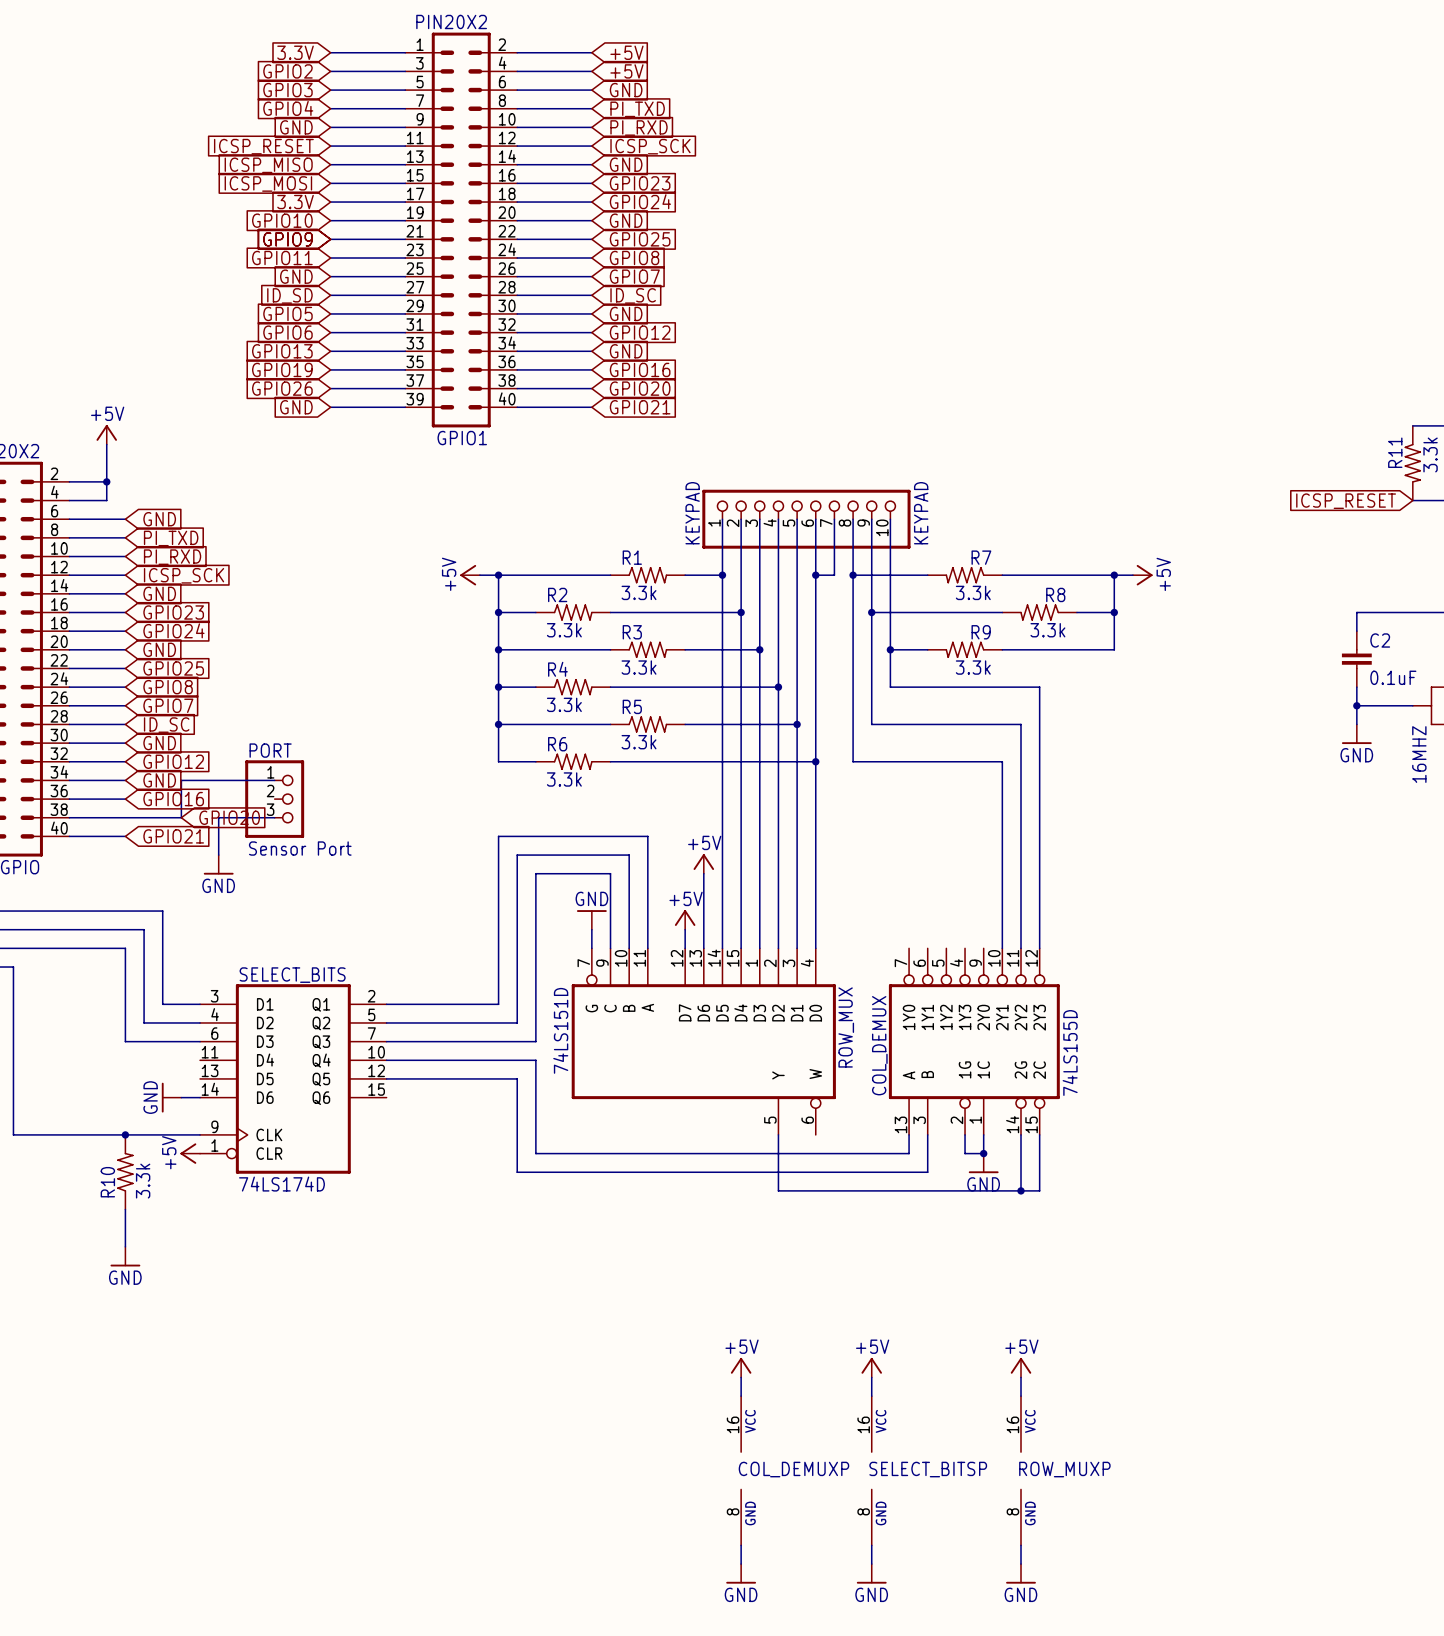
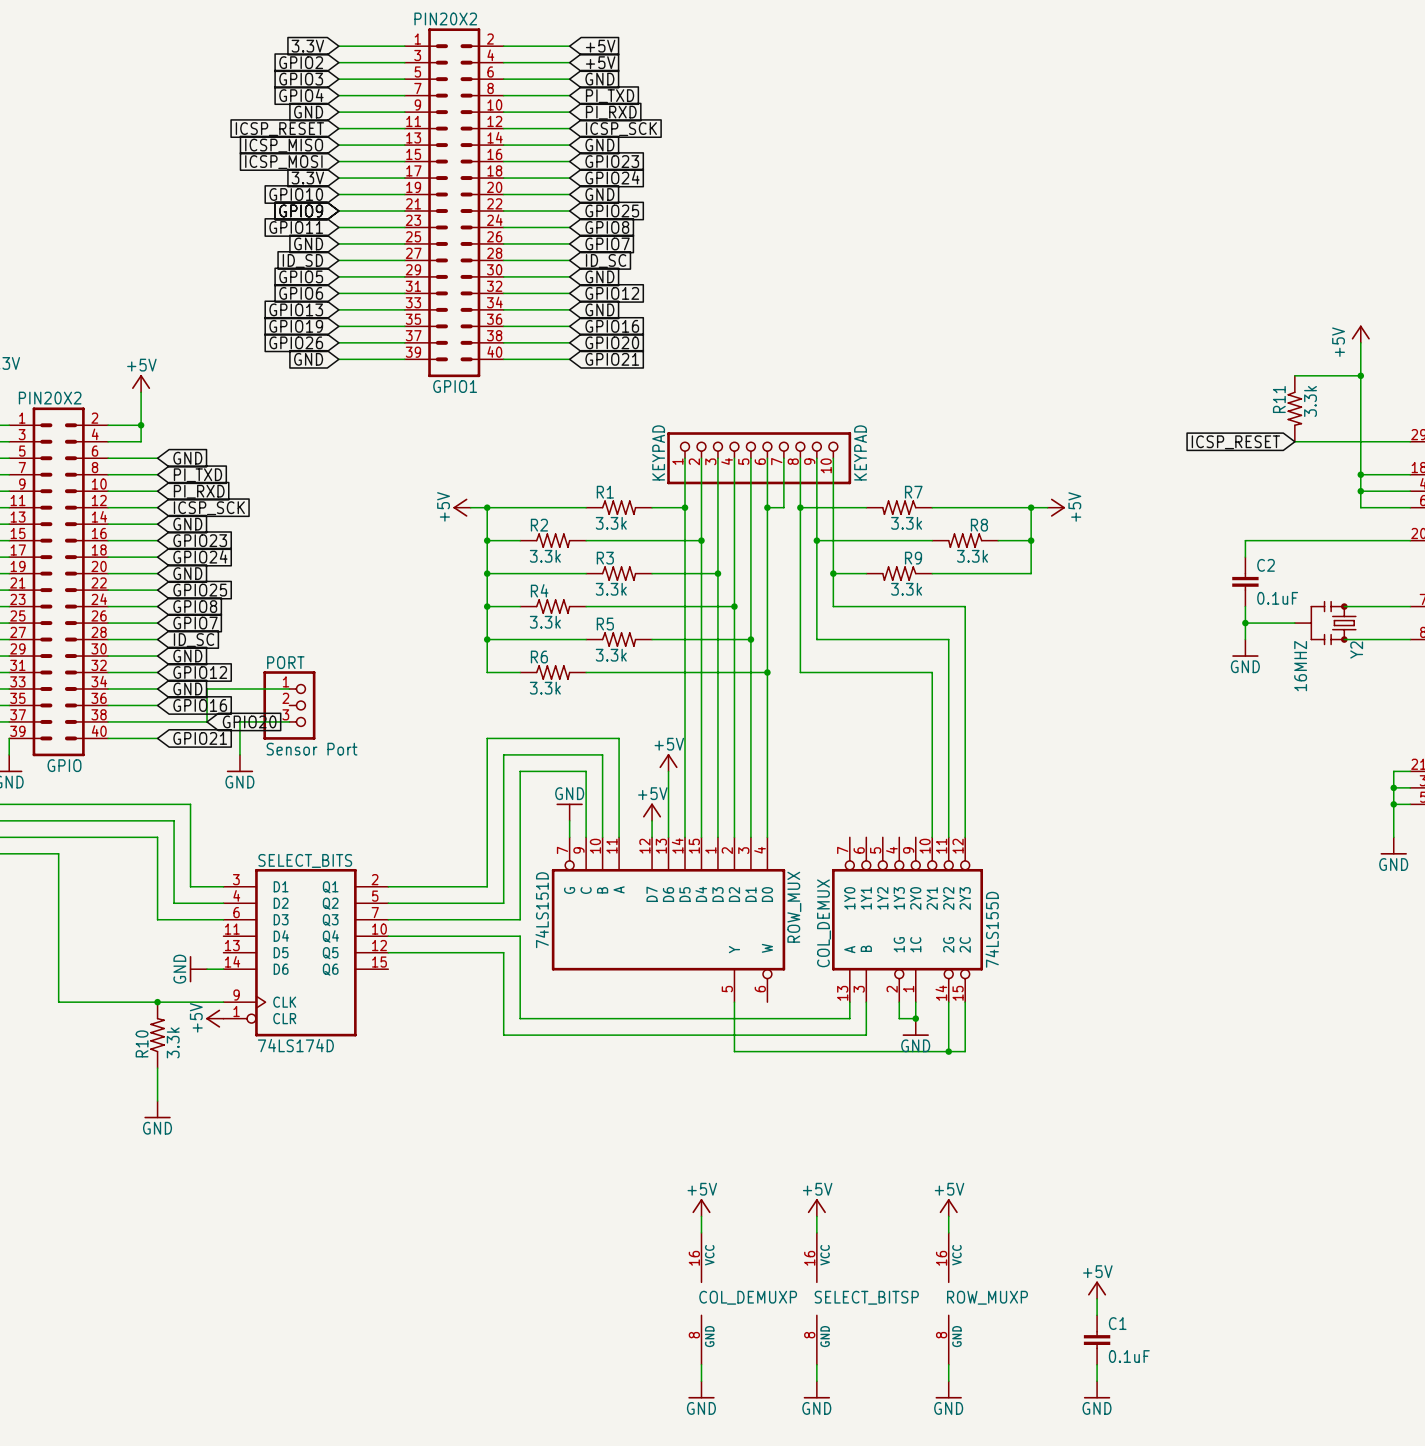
power symbol: none -> +5V (1097, 1290)
wire: none -> (1097, 1298) (1097, 1315)
C1: none -> 0.1uF (1097, 1340)
wire: none -> (1097, 1364) (1097, 1381)
power symbol: none -> GND (1097, 1389)

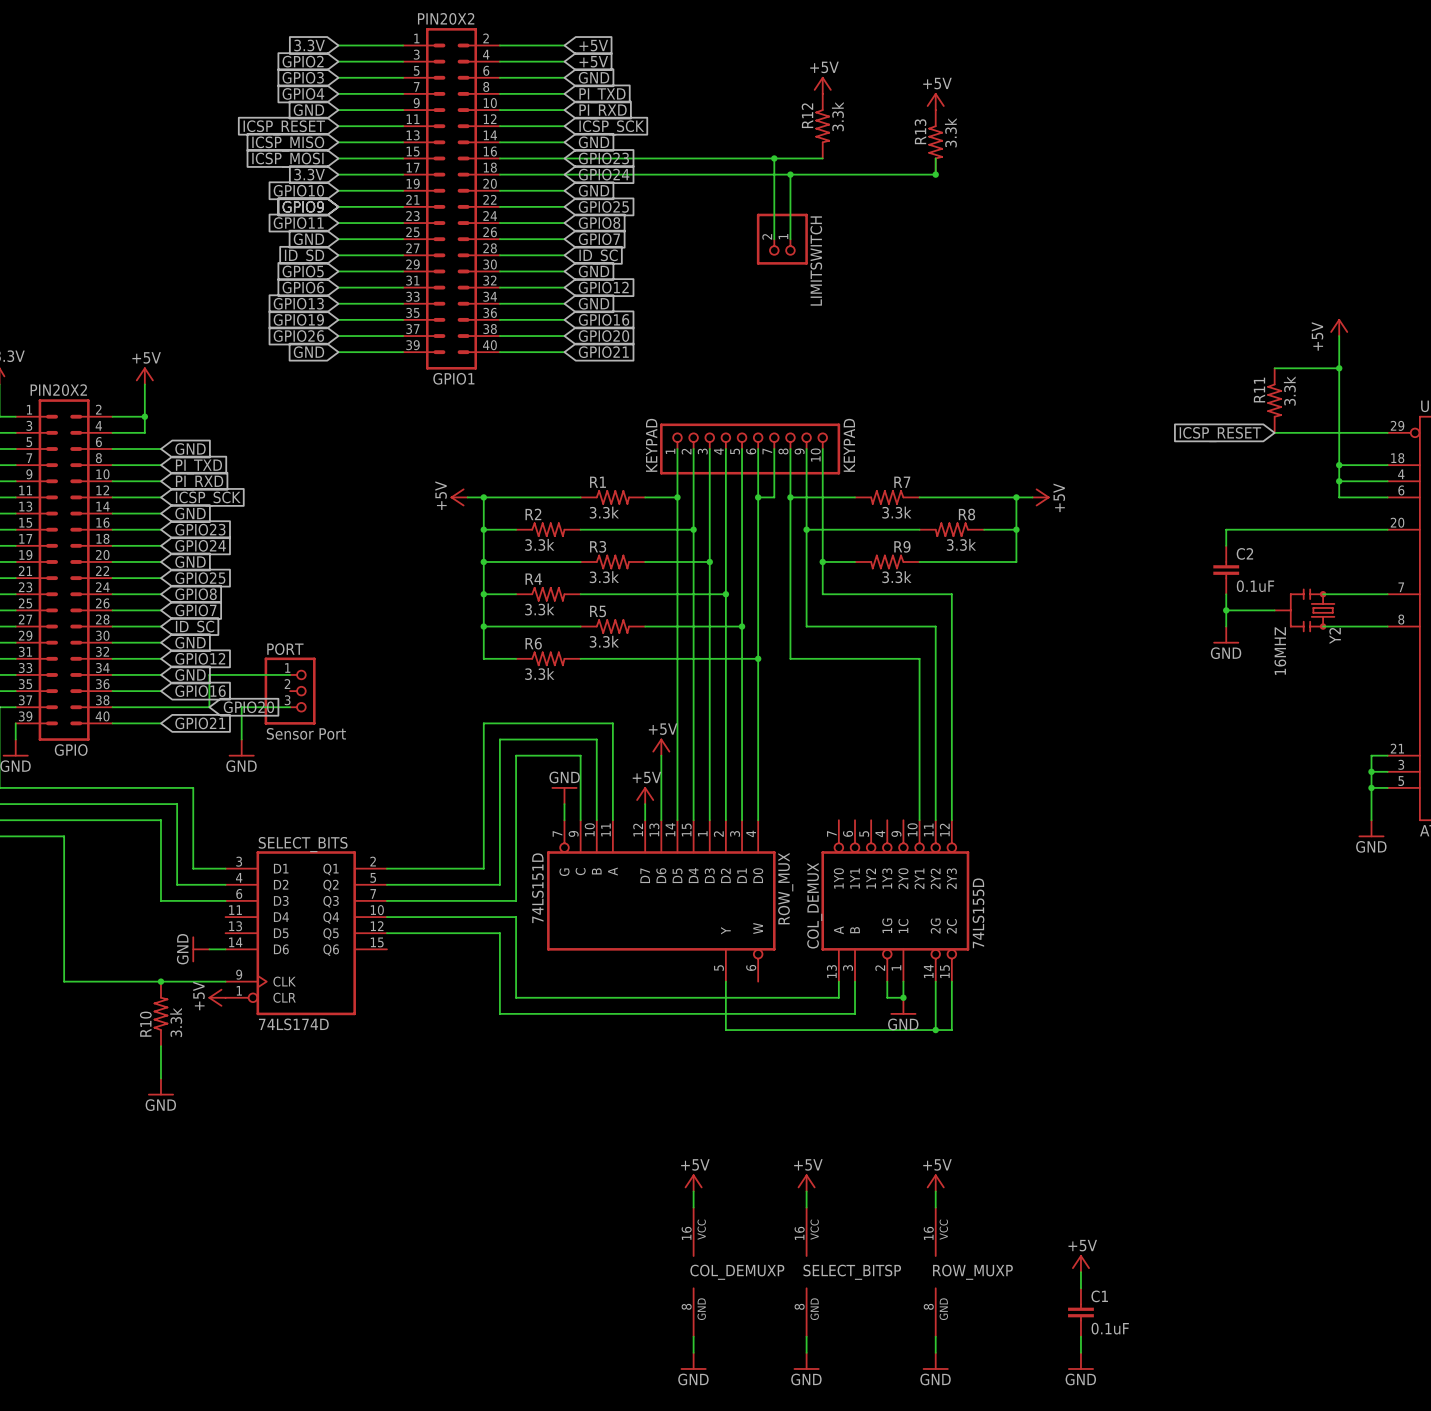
power symbol: none -> +5V (822, 85)
power symbol: none -> +5V (935, 101)
R12: none -> 3.3k (822, 126)
R13: none -> 3.3k (935, 142)
wire: none -> (564, 158) (822, 158)
wire: none -> (774, 158) (774, 239)
junction: none -> (774, 158)
wire: none -> (935, 158) (935, 174) (564, 174)
wire: none -> (790, 174) (790, 239)
junction: none -> (790, 174)
junction: none -> (935, 174)
LIMITSWITCH: none -> (782, 239)

